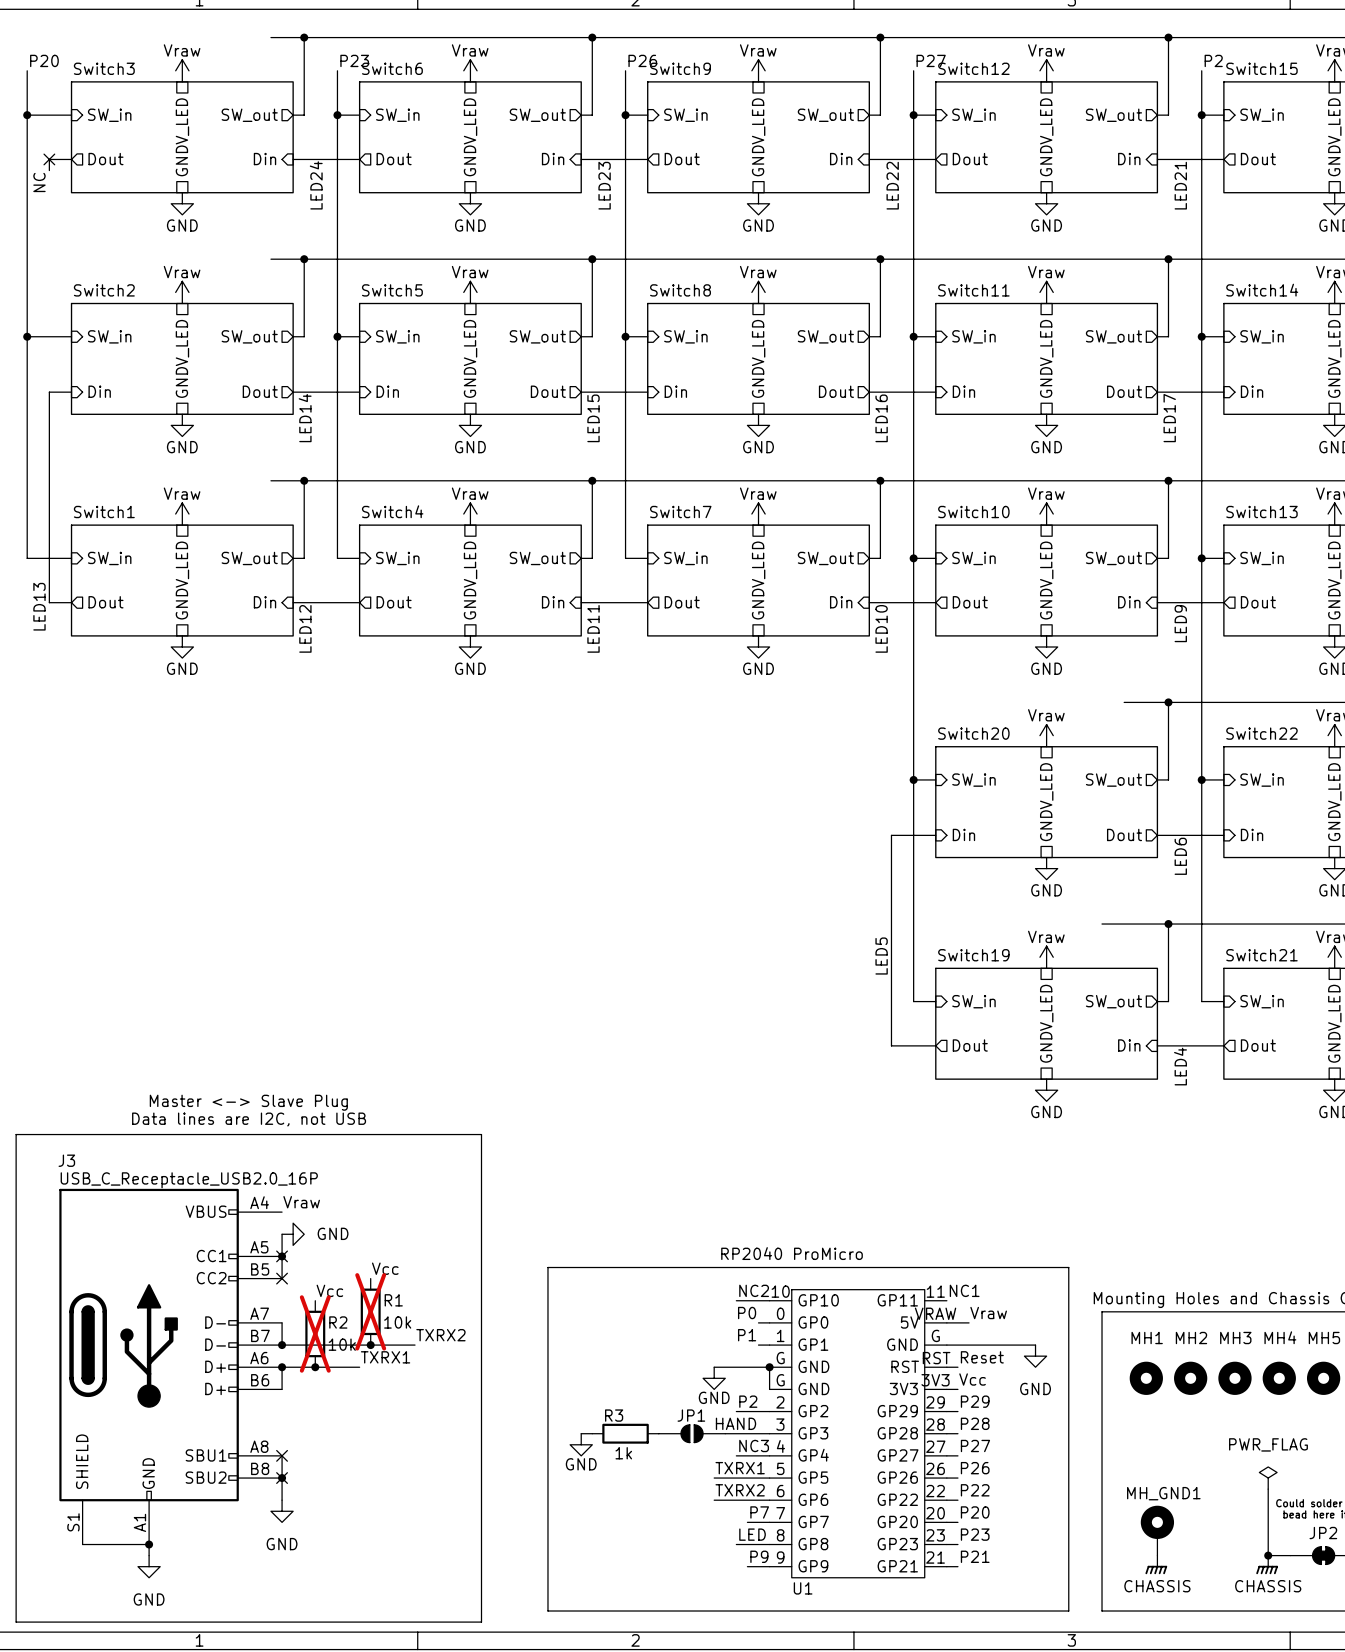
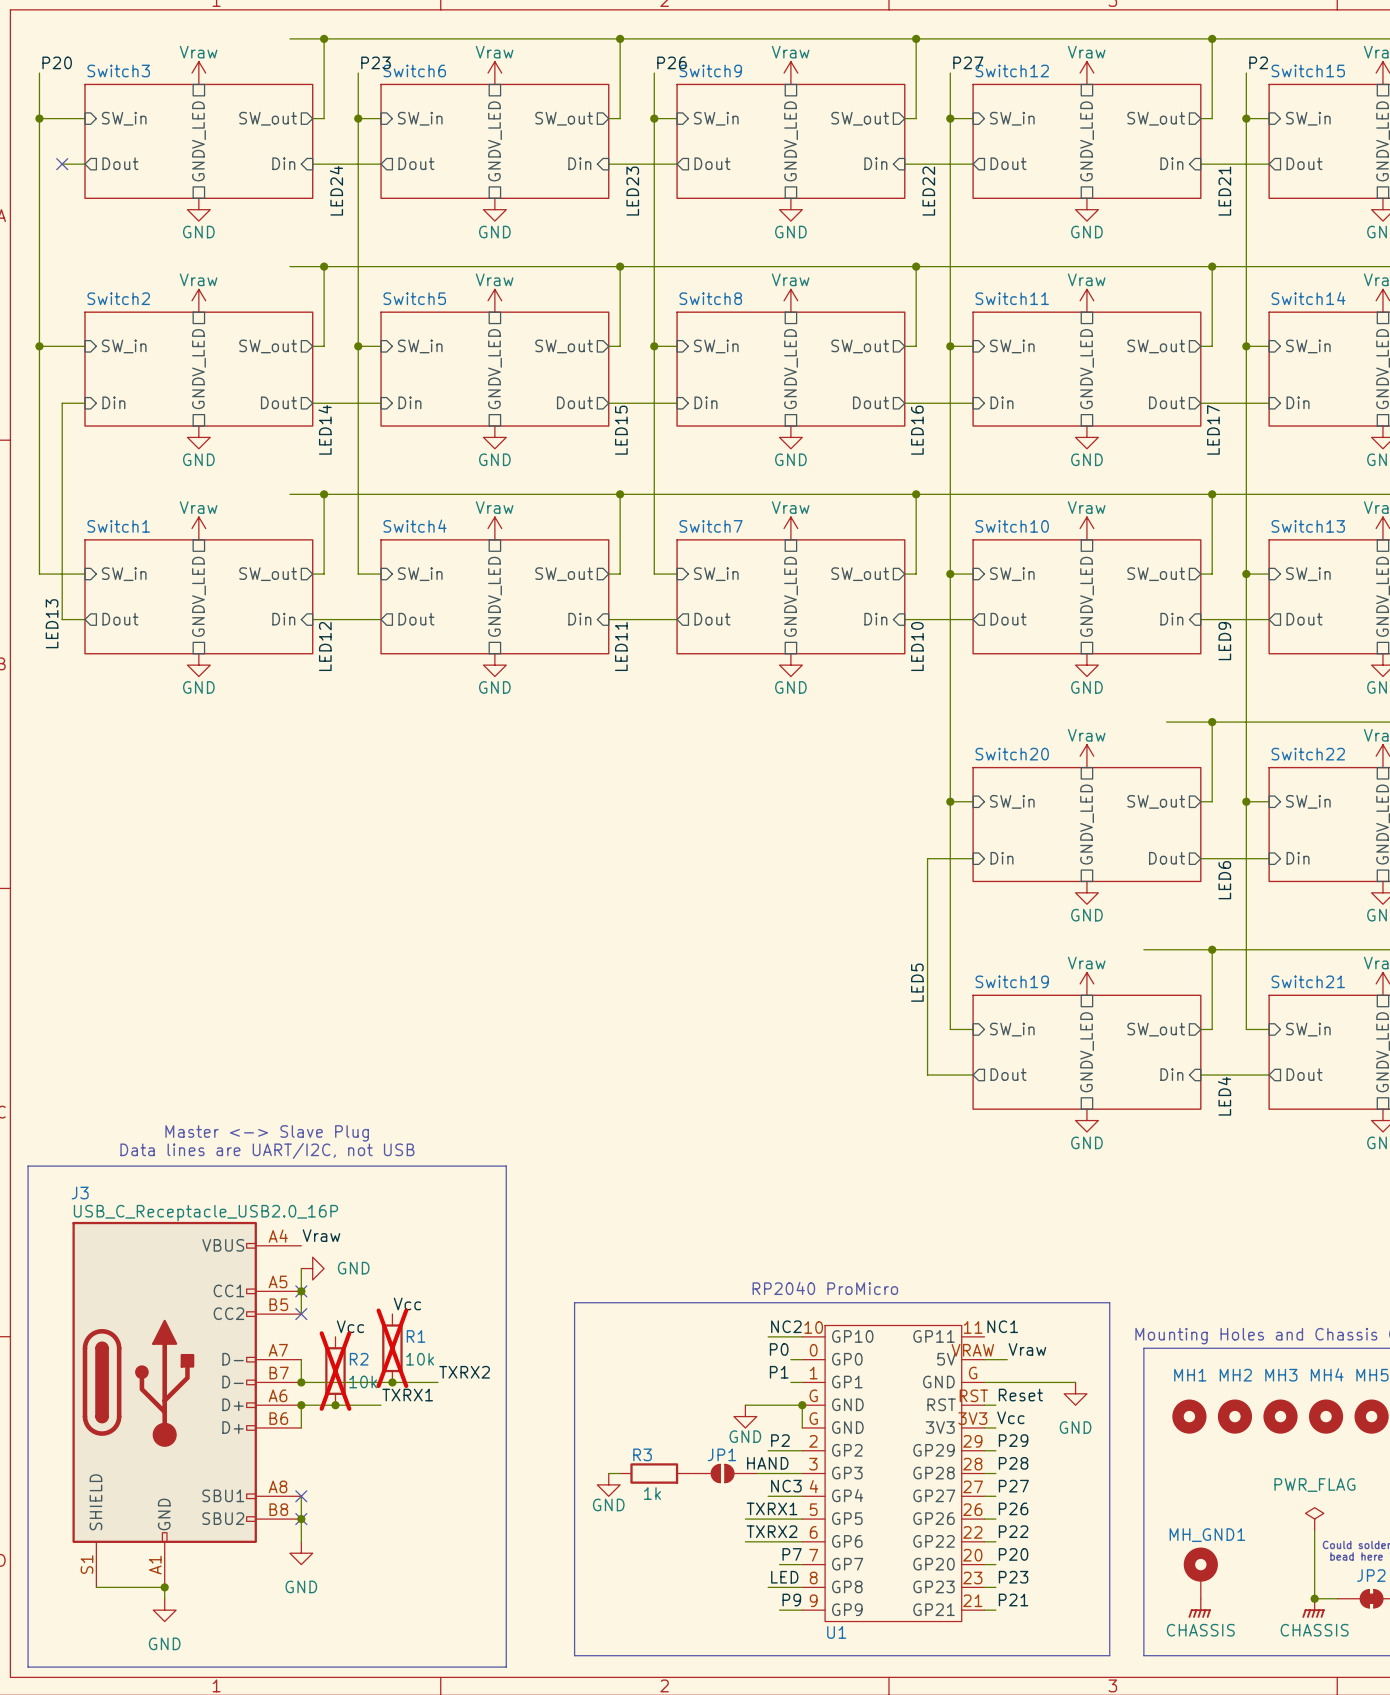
wire: (49, 159) (49, 170) -> none
label: NC (39, 182) -> none
text: Data lines are I2C, not USB (249, 1119) -> Data lines are UART/I2C, not USB (267, 1150)

